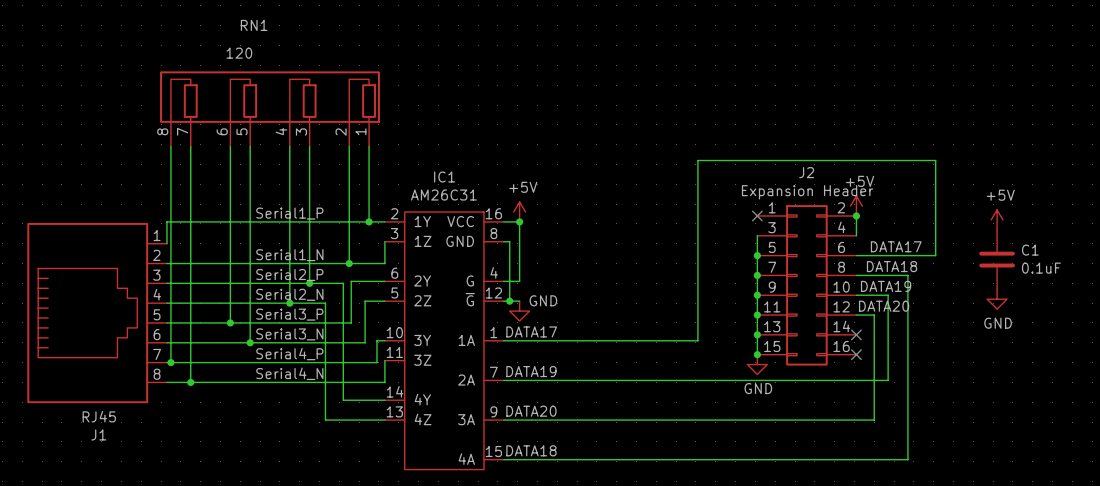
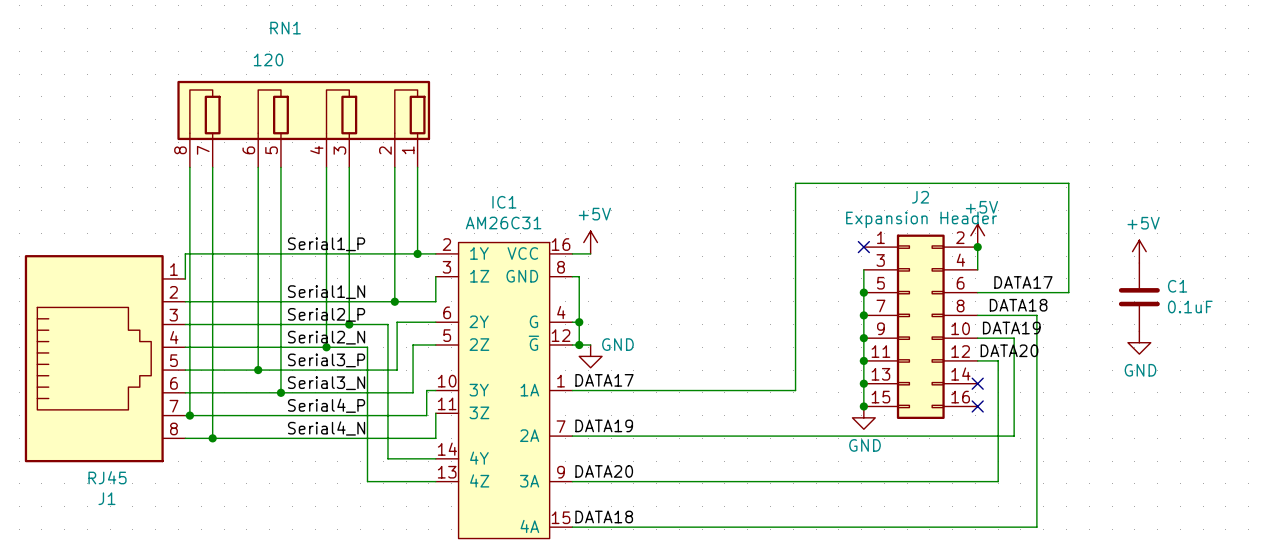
wire: (519, 221) (519, 281) (509, 281) -> none
junction: (519, 221) -> none
junction: none -> (579, 322)

